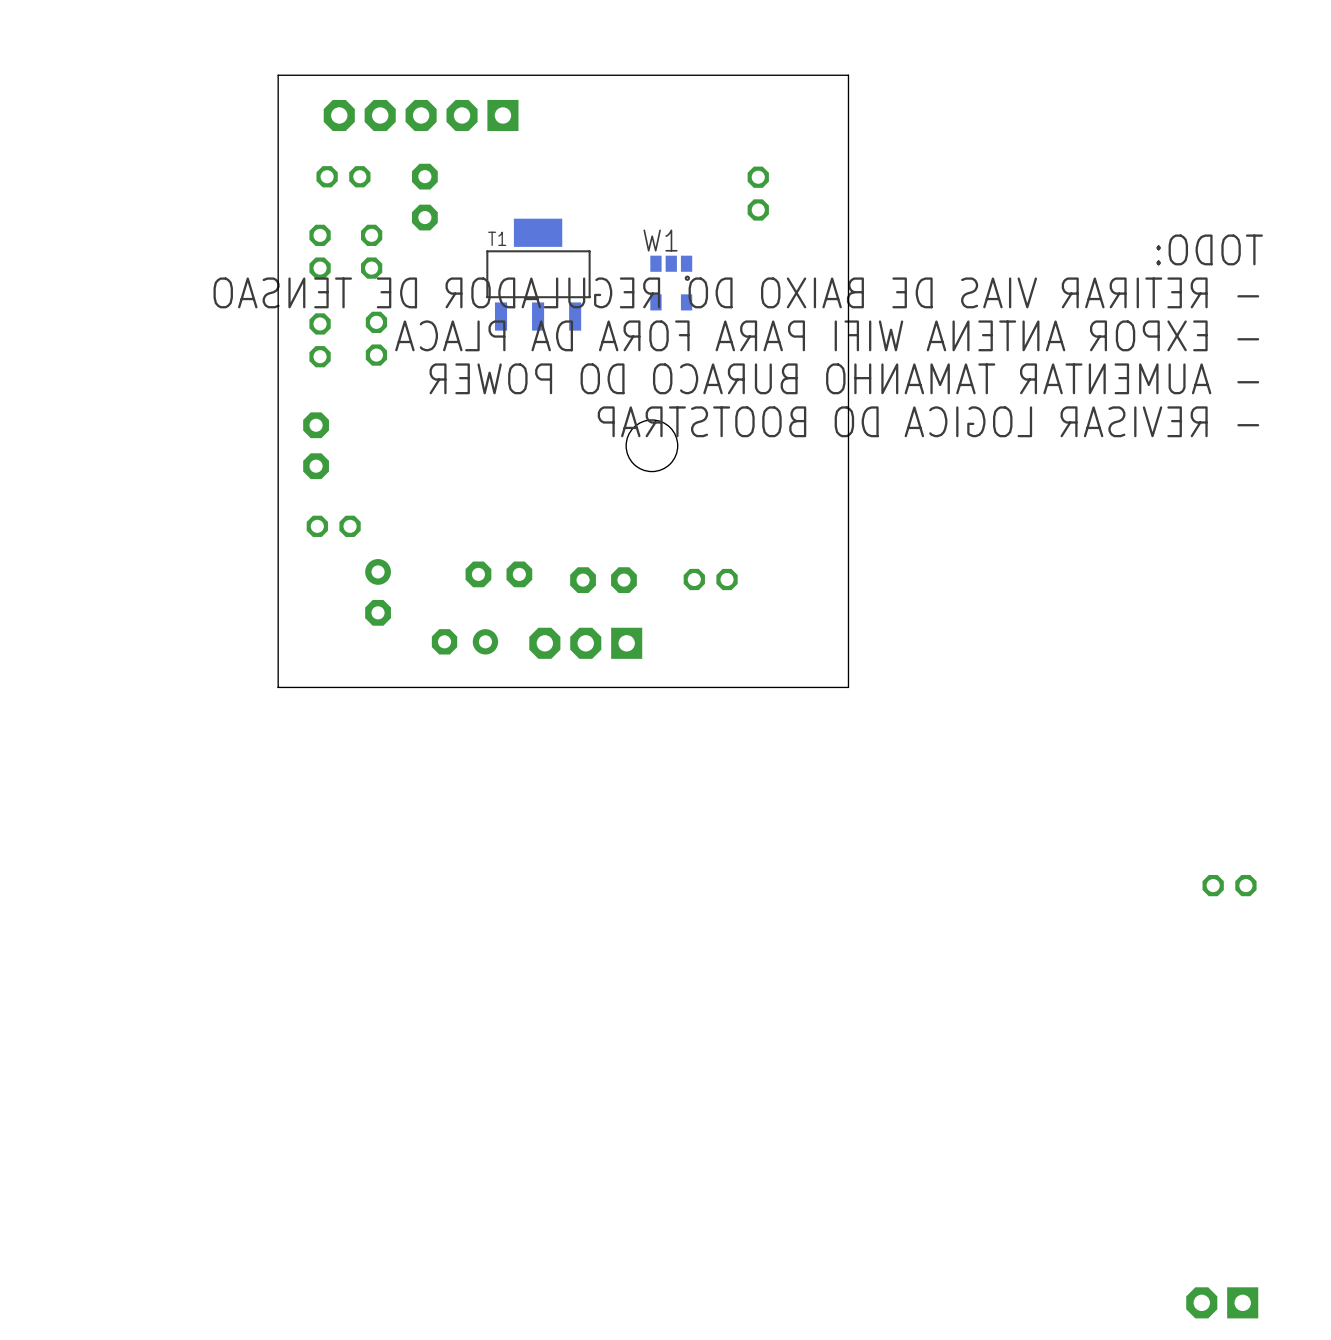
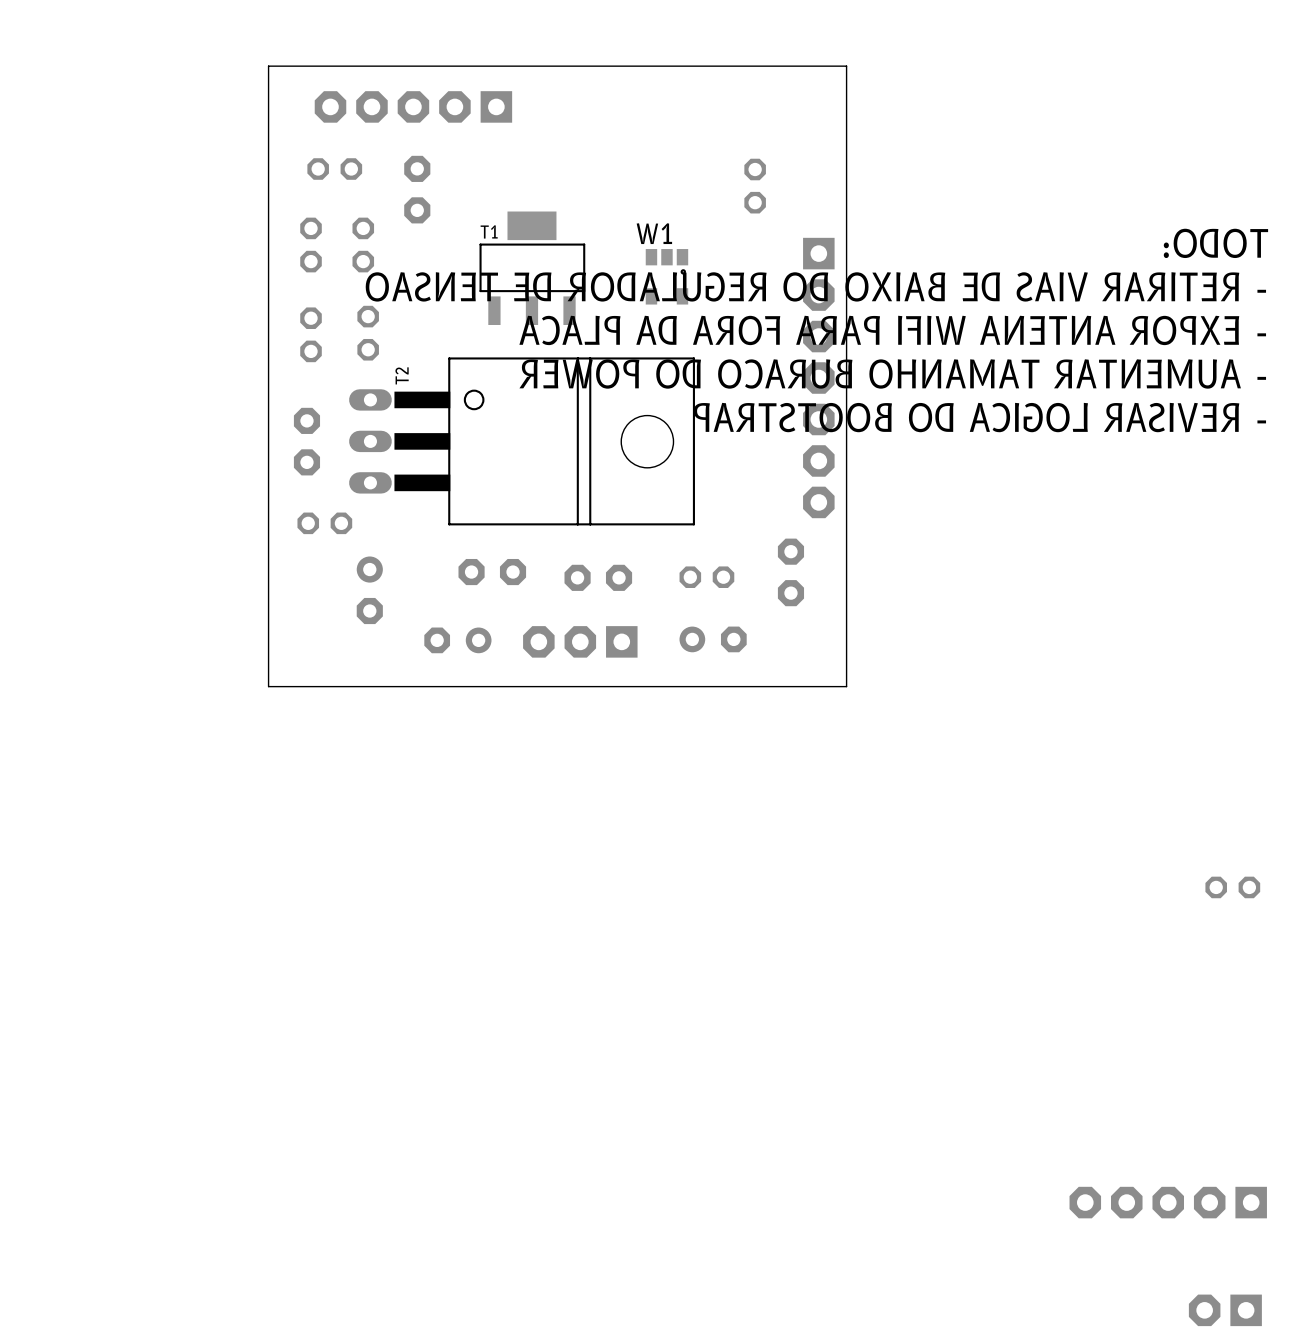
part: none -> (818, 378)
T2: none -> (522, 441)
part: none -> (790, 572)
part: none -> (713, 639)
part: none -> (1168, 1202)

